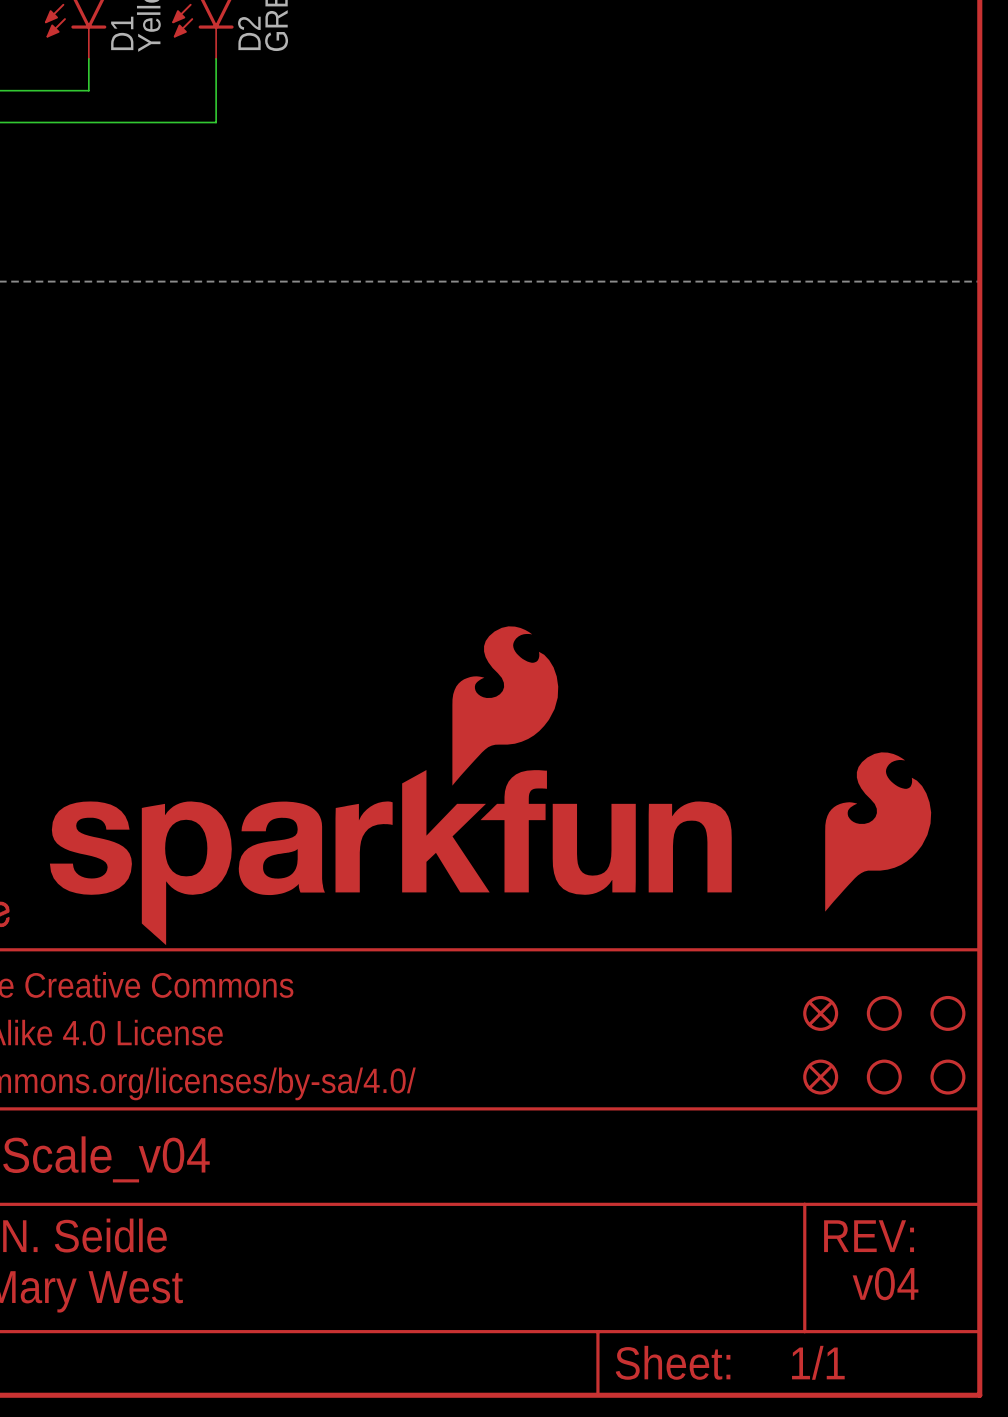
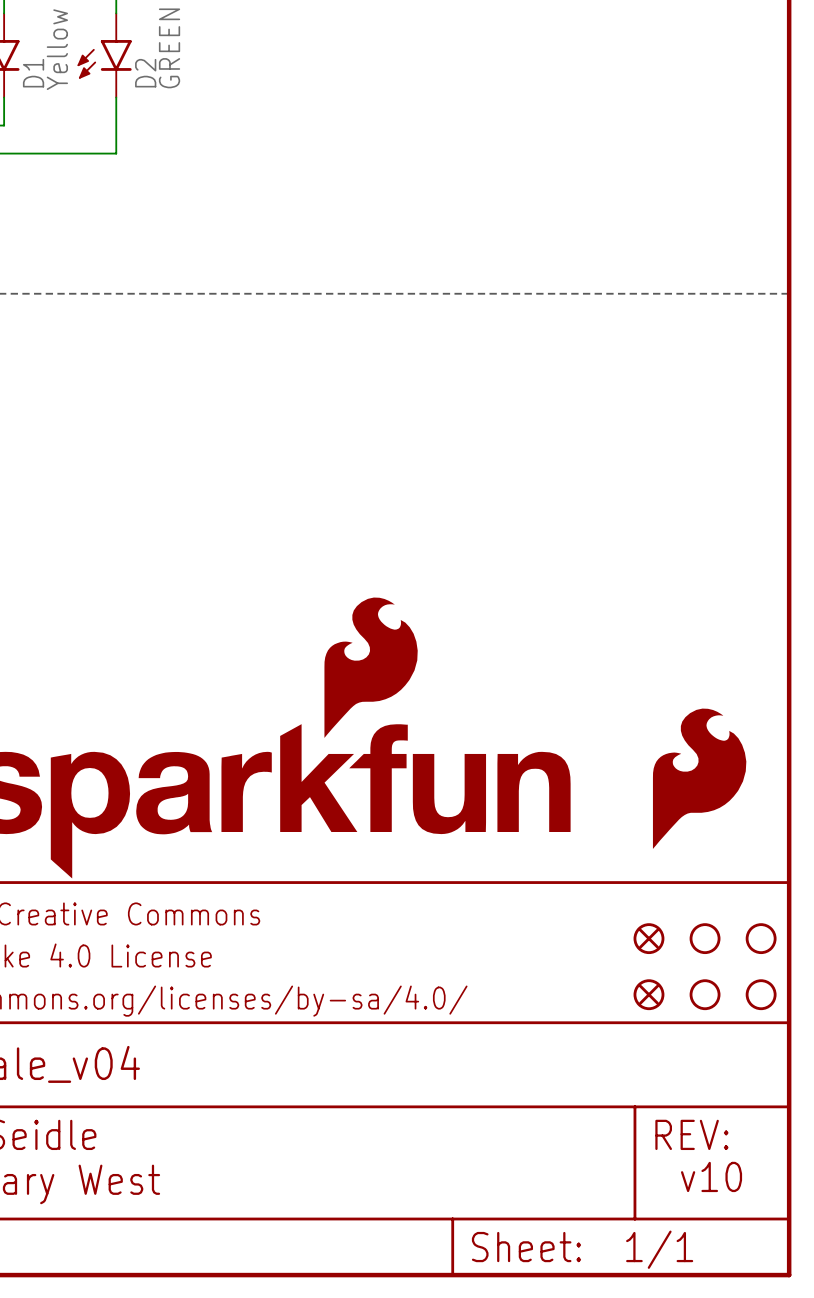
text: v04 (885, 1283) -> v10 (711, 1176)

